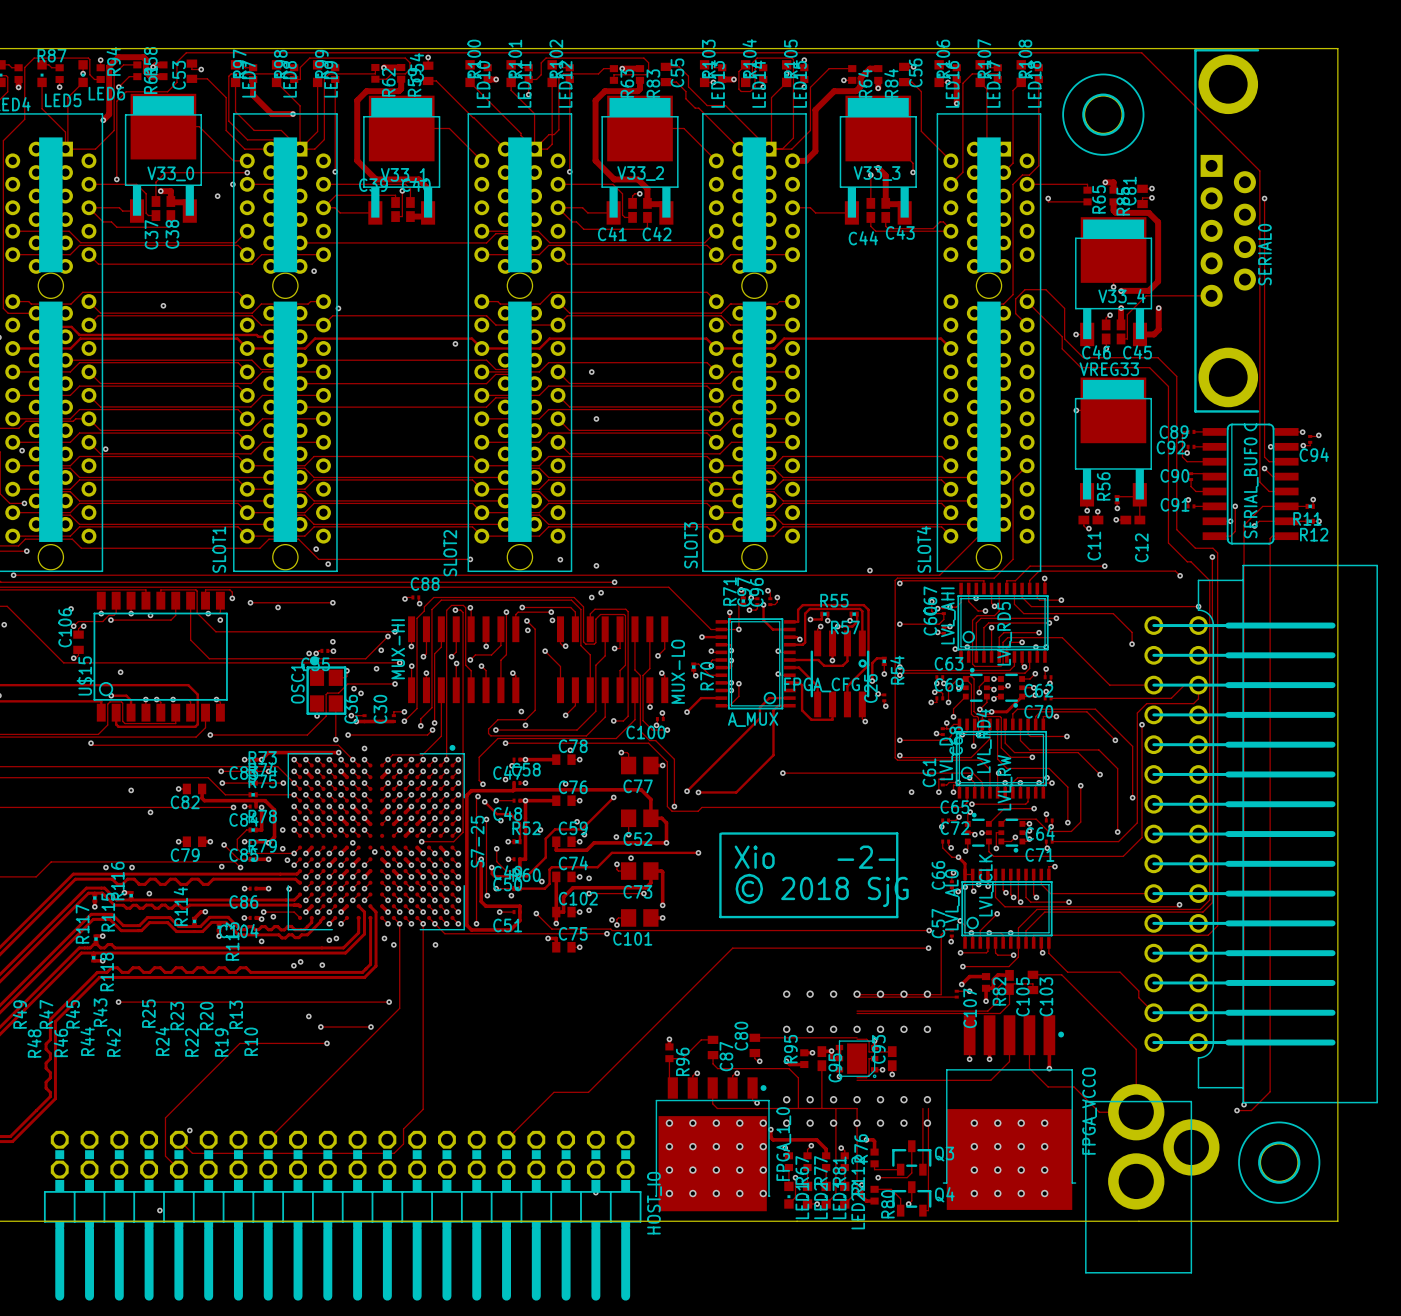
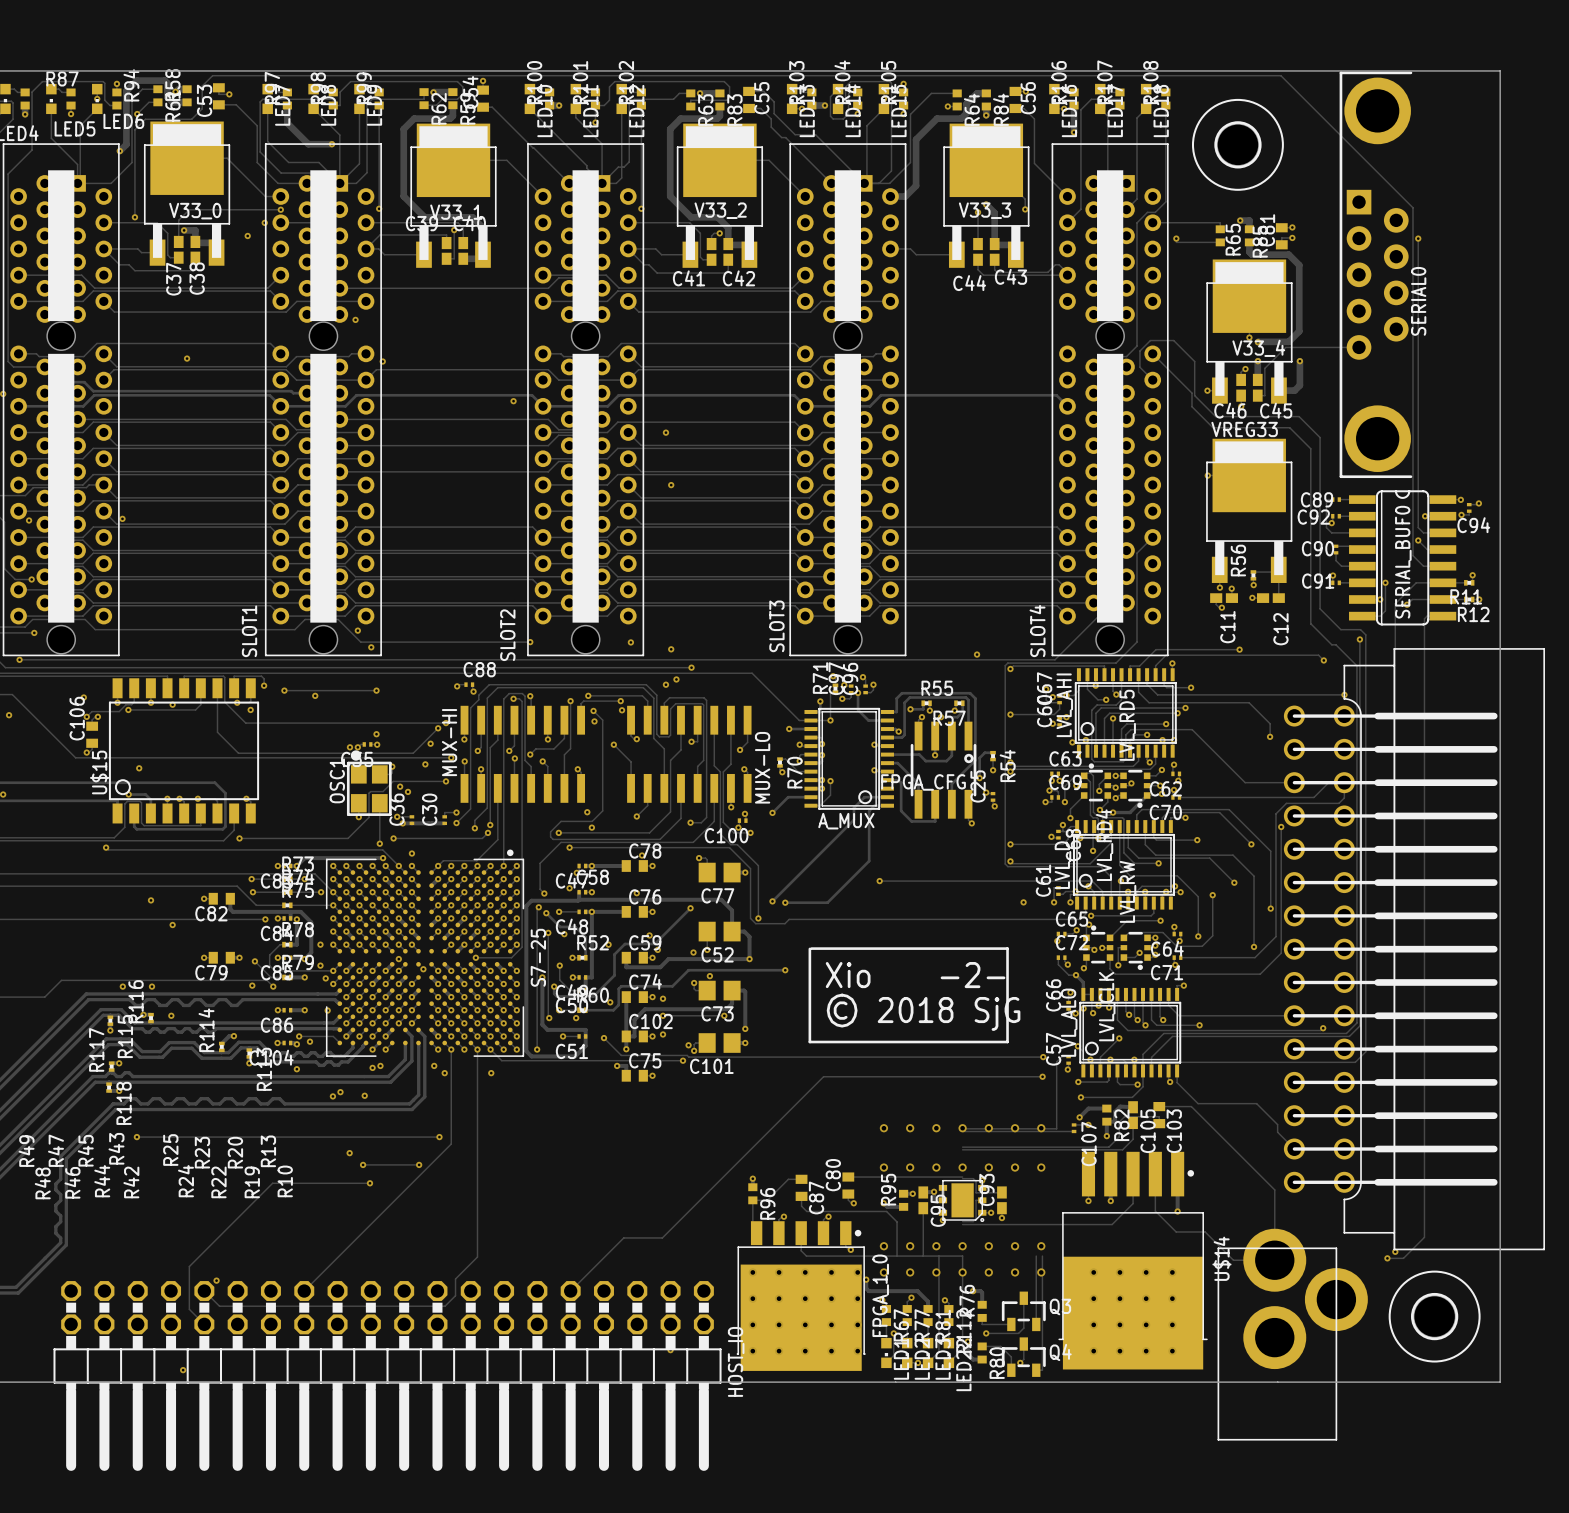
FPGA_VCCO name: FPGA_VCCO (1089, 1111) -> U$14 (1221, 1258)

